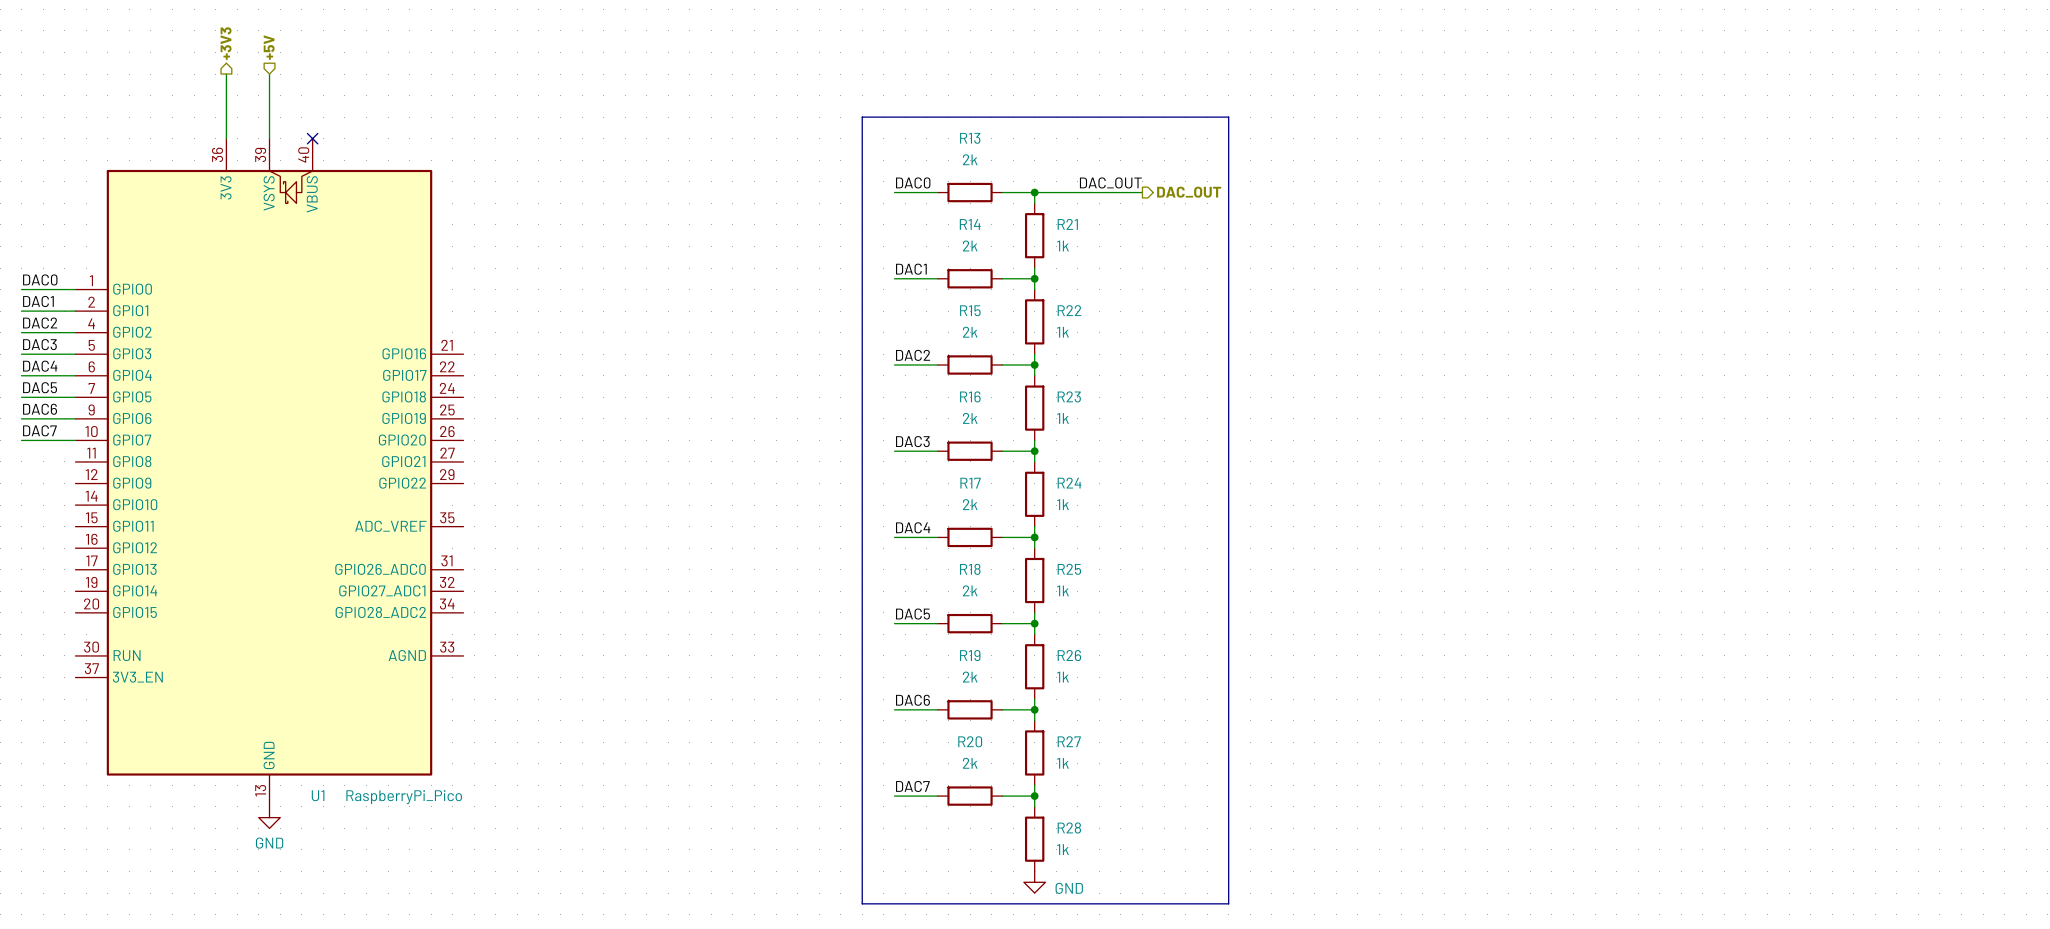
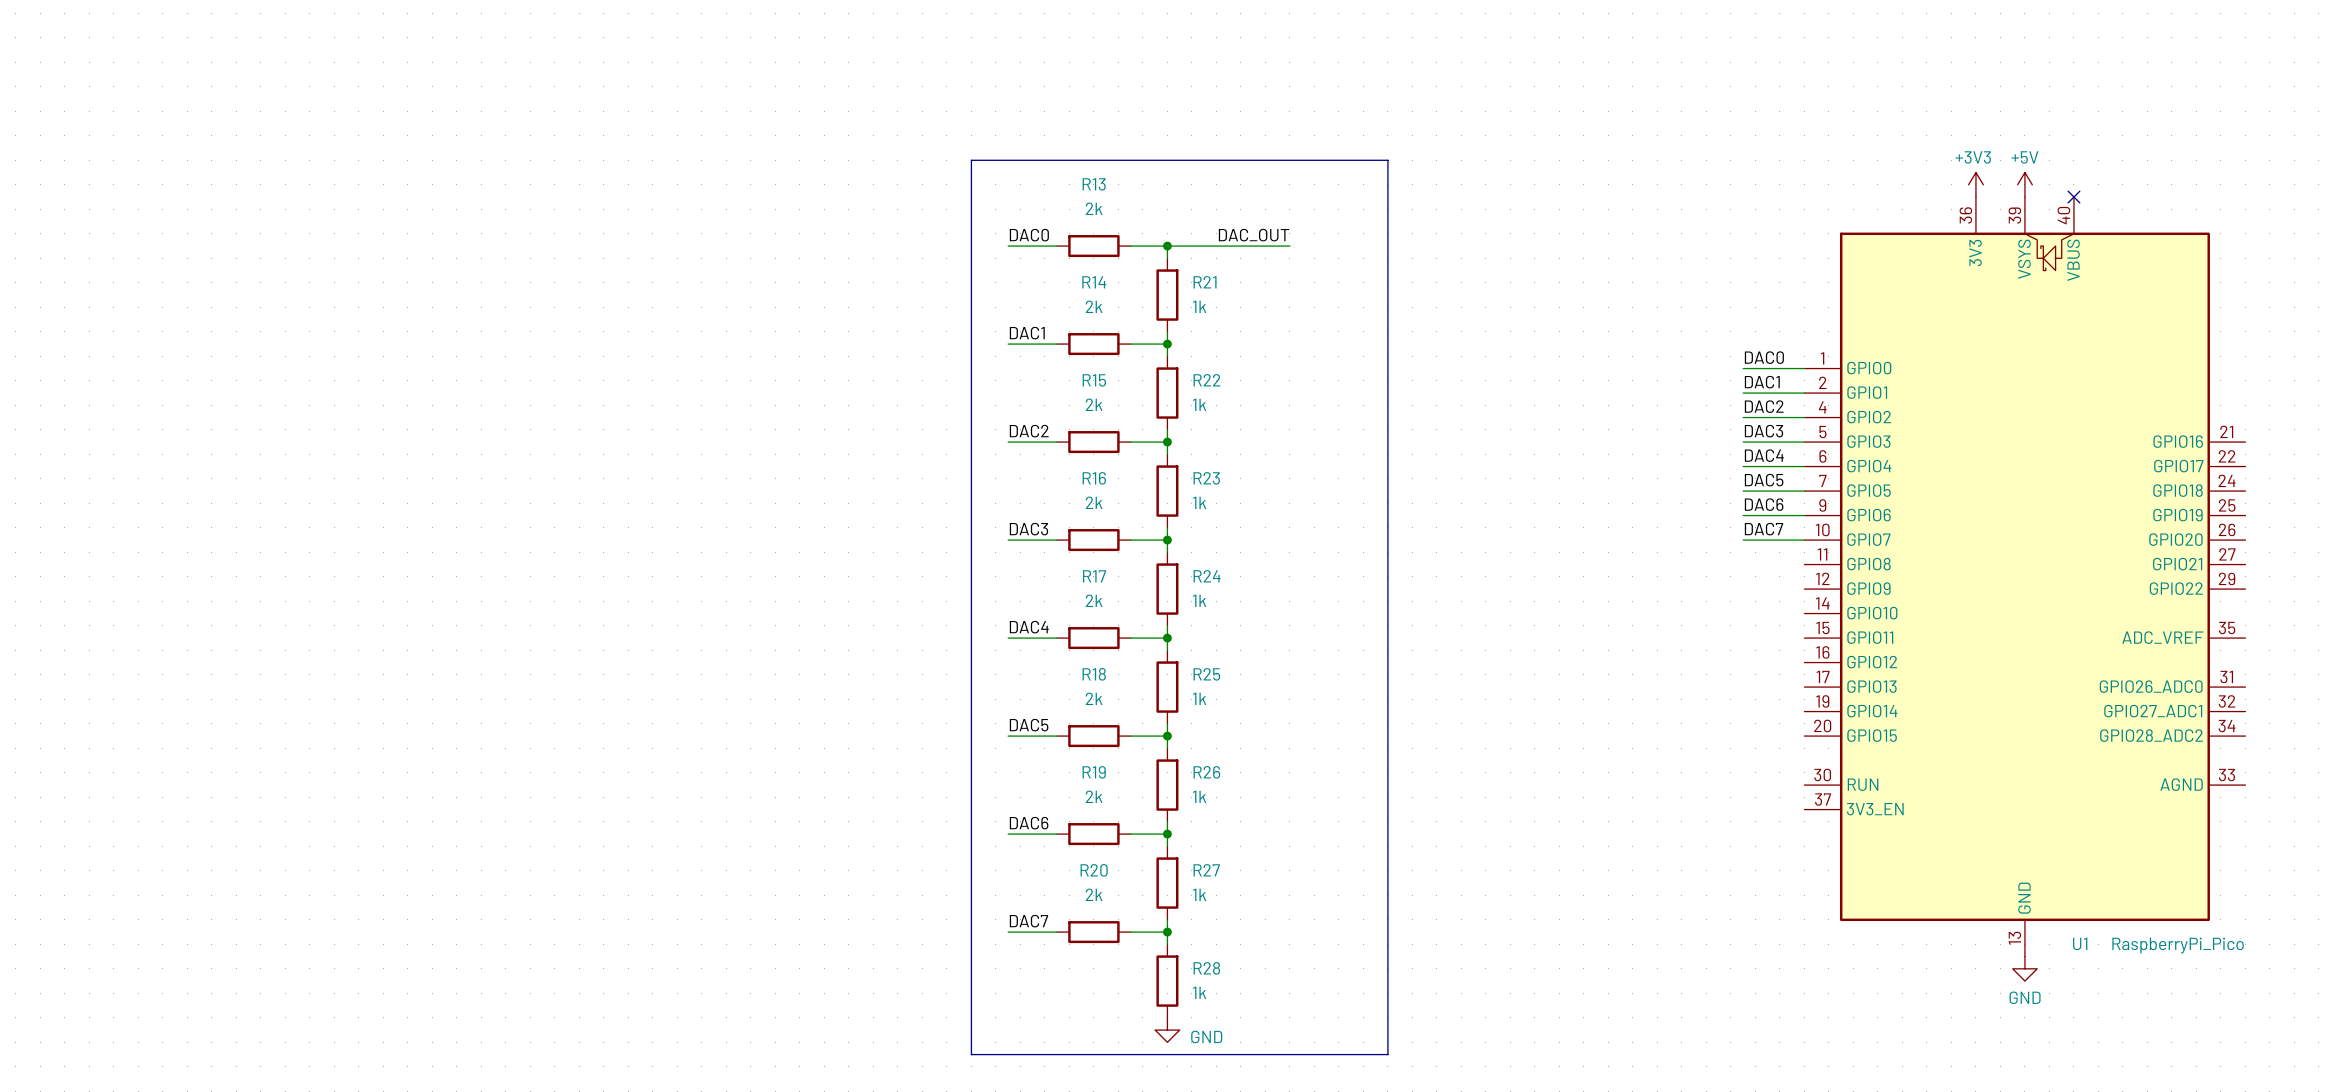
hierarchical label: +3V3 (226, 43) -> none
hierarchical label: +5V (269, 47) -> none
wire: (226, 74) (226, 138) -> none
wire: (269, 74) (269, 138) -> none
no-connect mark: (312, 138) -> none
power symbol: none -> +3V3 (1975, 184)
power symbol: none -> +5V (2024, 184)
no-connect mark: none -> (2073, 197)
hierarchical label: DAC_OUT (1189, 192) -> none
label: DAC0 (40, 279) -> none
wire: (21, 289) (75, 289) -> none
label: none -> DAC0 (1764, 357)
wire: none -> (1743, 368) (1804, 368)
label: DAC1 (38, 301) -> none
wire: (21, 311) (75, 311) -> none
label: none -> DAC1 (1762, 382)
wire: none -> (1743, 393) (1804, 393)
label: DAC2 (40, 323) -> none
wire: (21, 332) (75, 332) -> none
label: none -> DAC2 (1764, 406)
wire: none -> (1743, 417) (1804, 417)
label: DAC3 (39, 344) -> none
wire: (21, 354) (75, 354) -> none
label: none -> DAC3 (1763, 431)
wire: none -> (1743, 442) (1804, 442)
label: DAC4 (40, 366) -> none
wire: (21, 375) (75, 375) -> none
label: none -> DAC4 (1764, 455)
wire: none -> (1743, 466) (1804, 466)
label: DAC5 (40, 387) -> none
wire: (21, 397) (75, 397) -> none
label: none -> DAC5 (1764, 480)
wire: none -> (1743, 491) (1804, 491)
label: DAC6 (40, 409) -> none
wire: (21, 418) (75, 418) -> none
label: none -> DAC6 (1764, 504)
wire: none -> (1743, 515) (1804, 515)
label: DAC7 (39, 430) -> none
wire: (21, 440) (75, 440) -> none
label: none -> DAC7 (1764, 529)
wire: none -> (1743, 540) (1804, 540)
U1 position: (269, 472) -> (2024, 576)
power symbol: GND (269, 817) -> none
power symbol: none -> GND (2024, 968)

